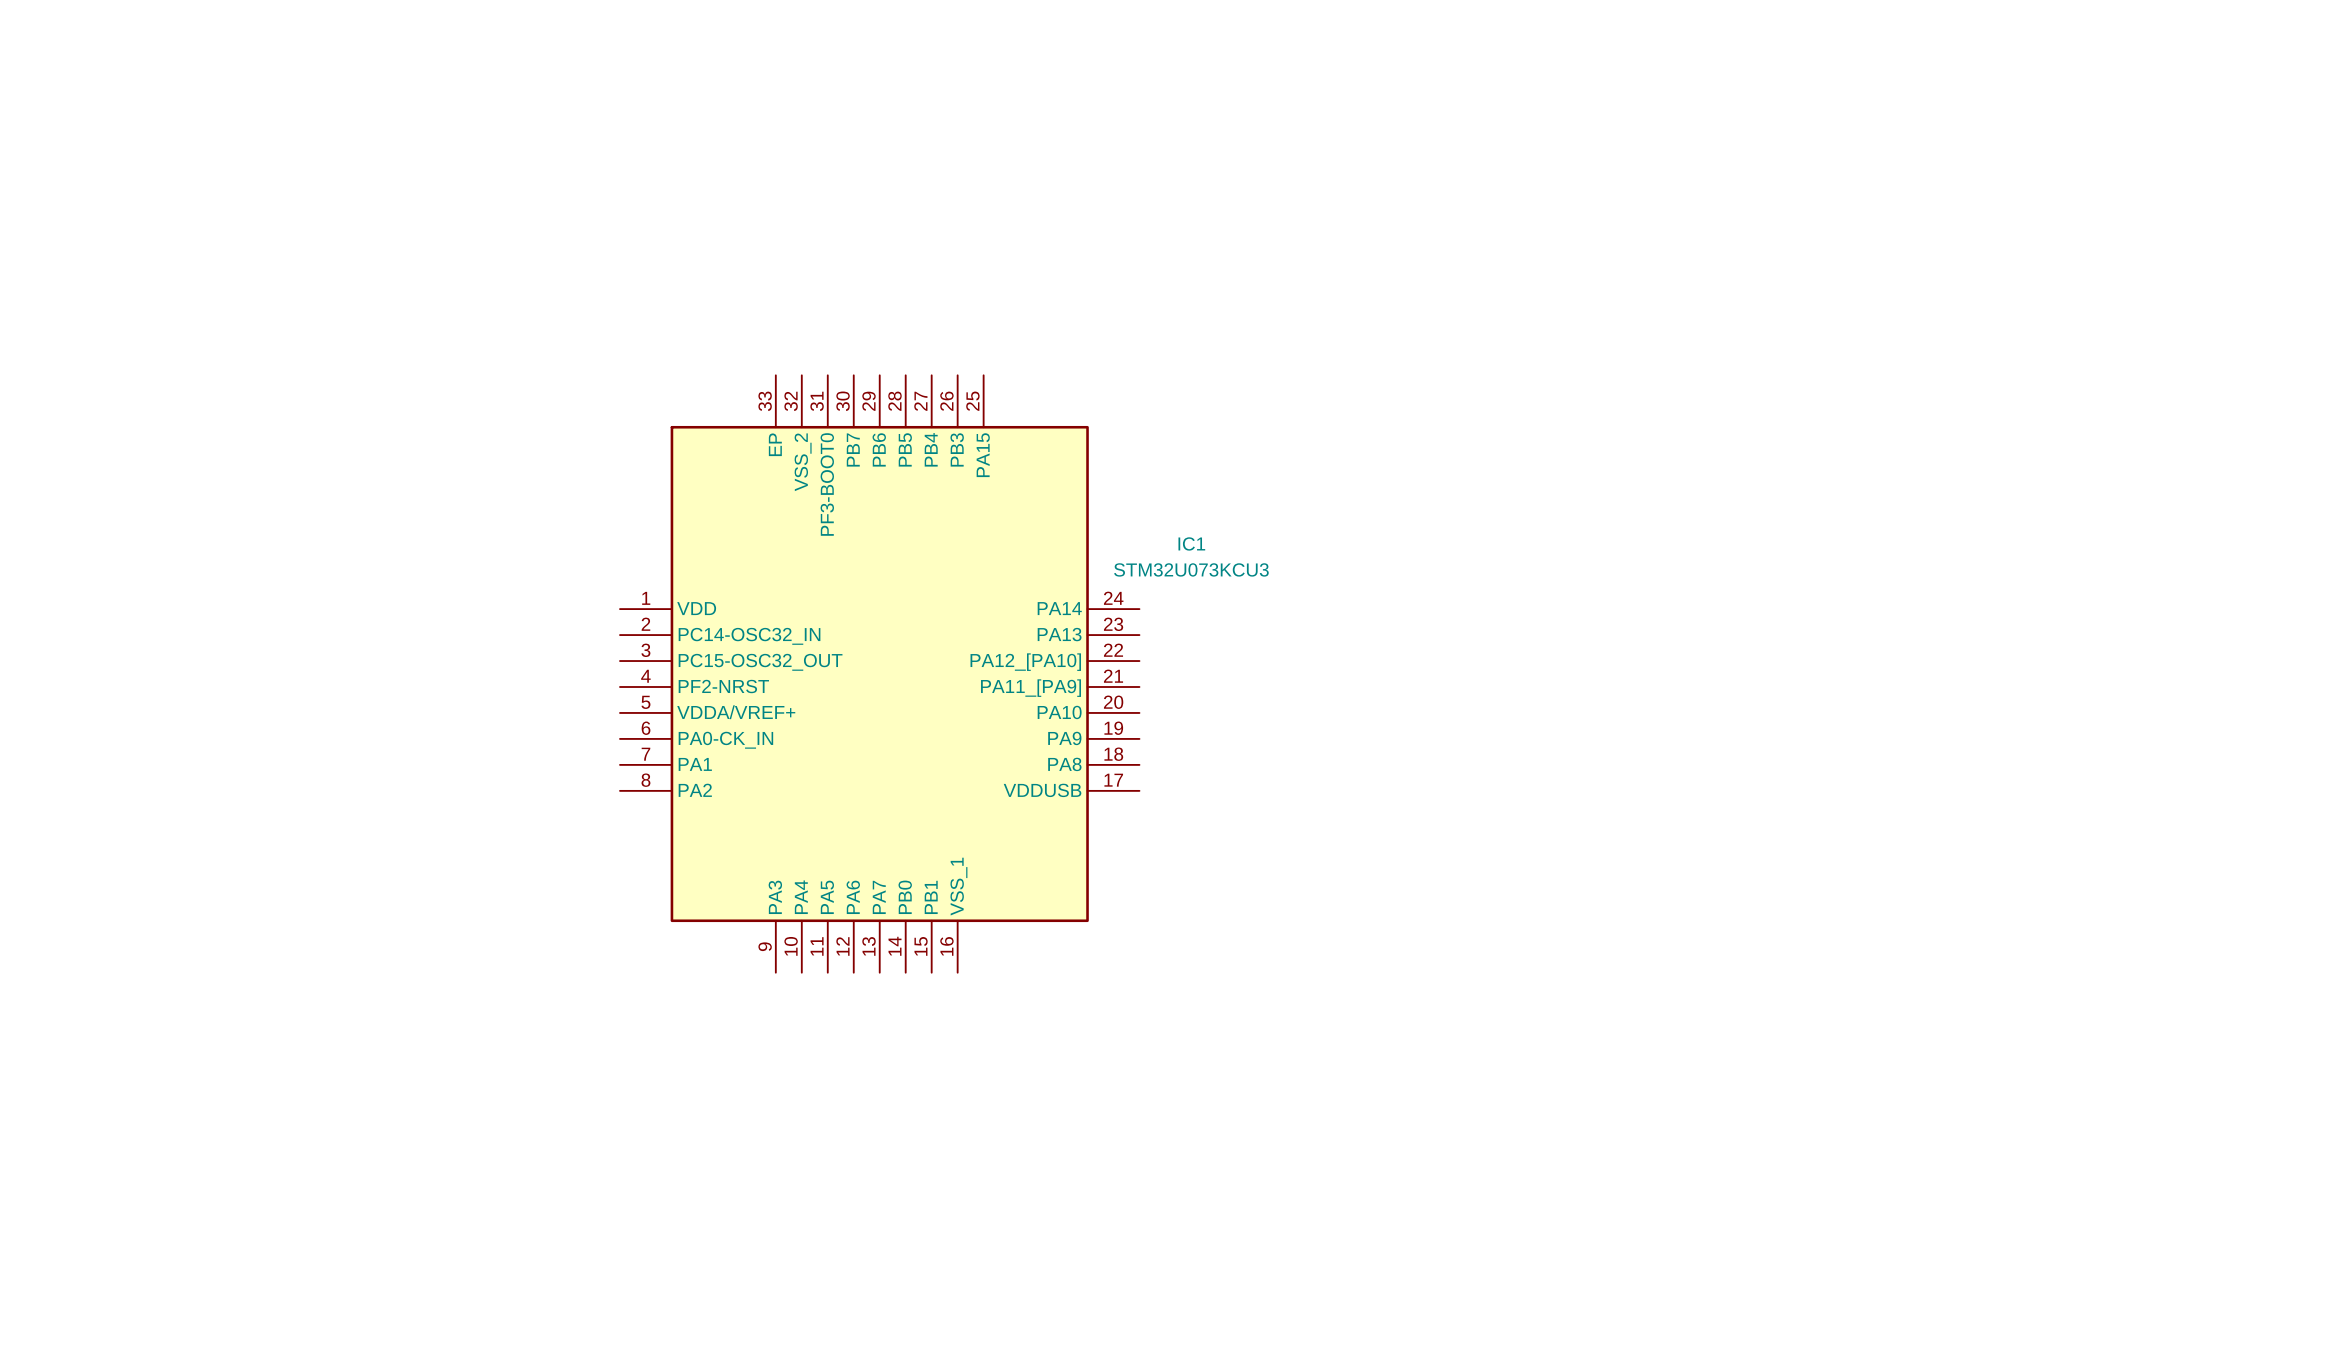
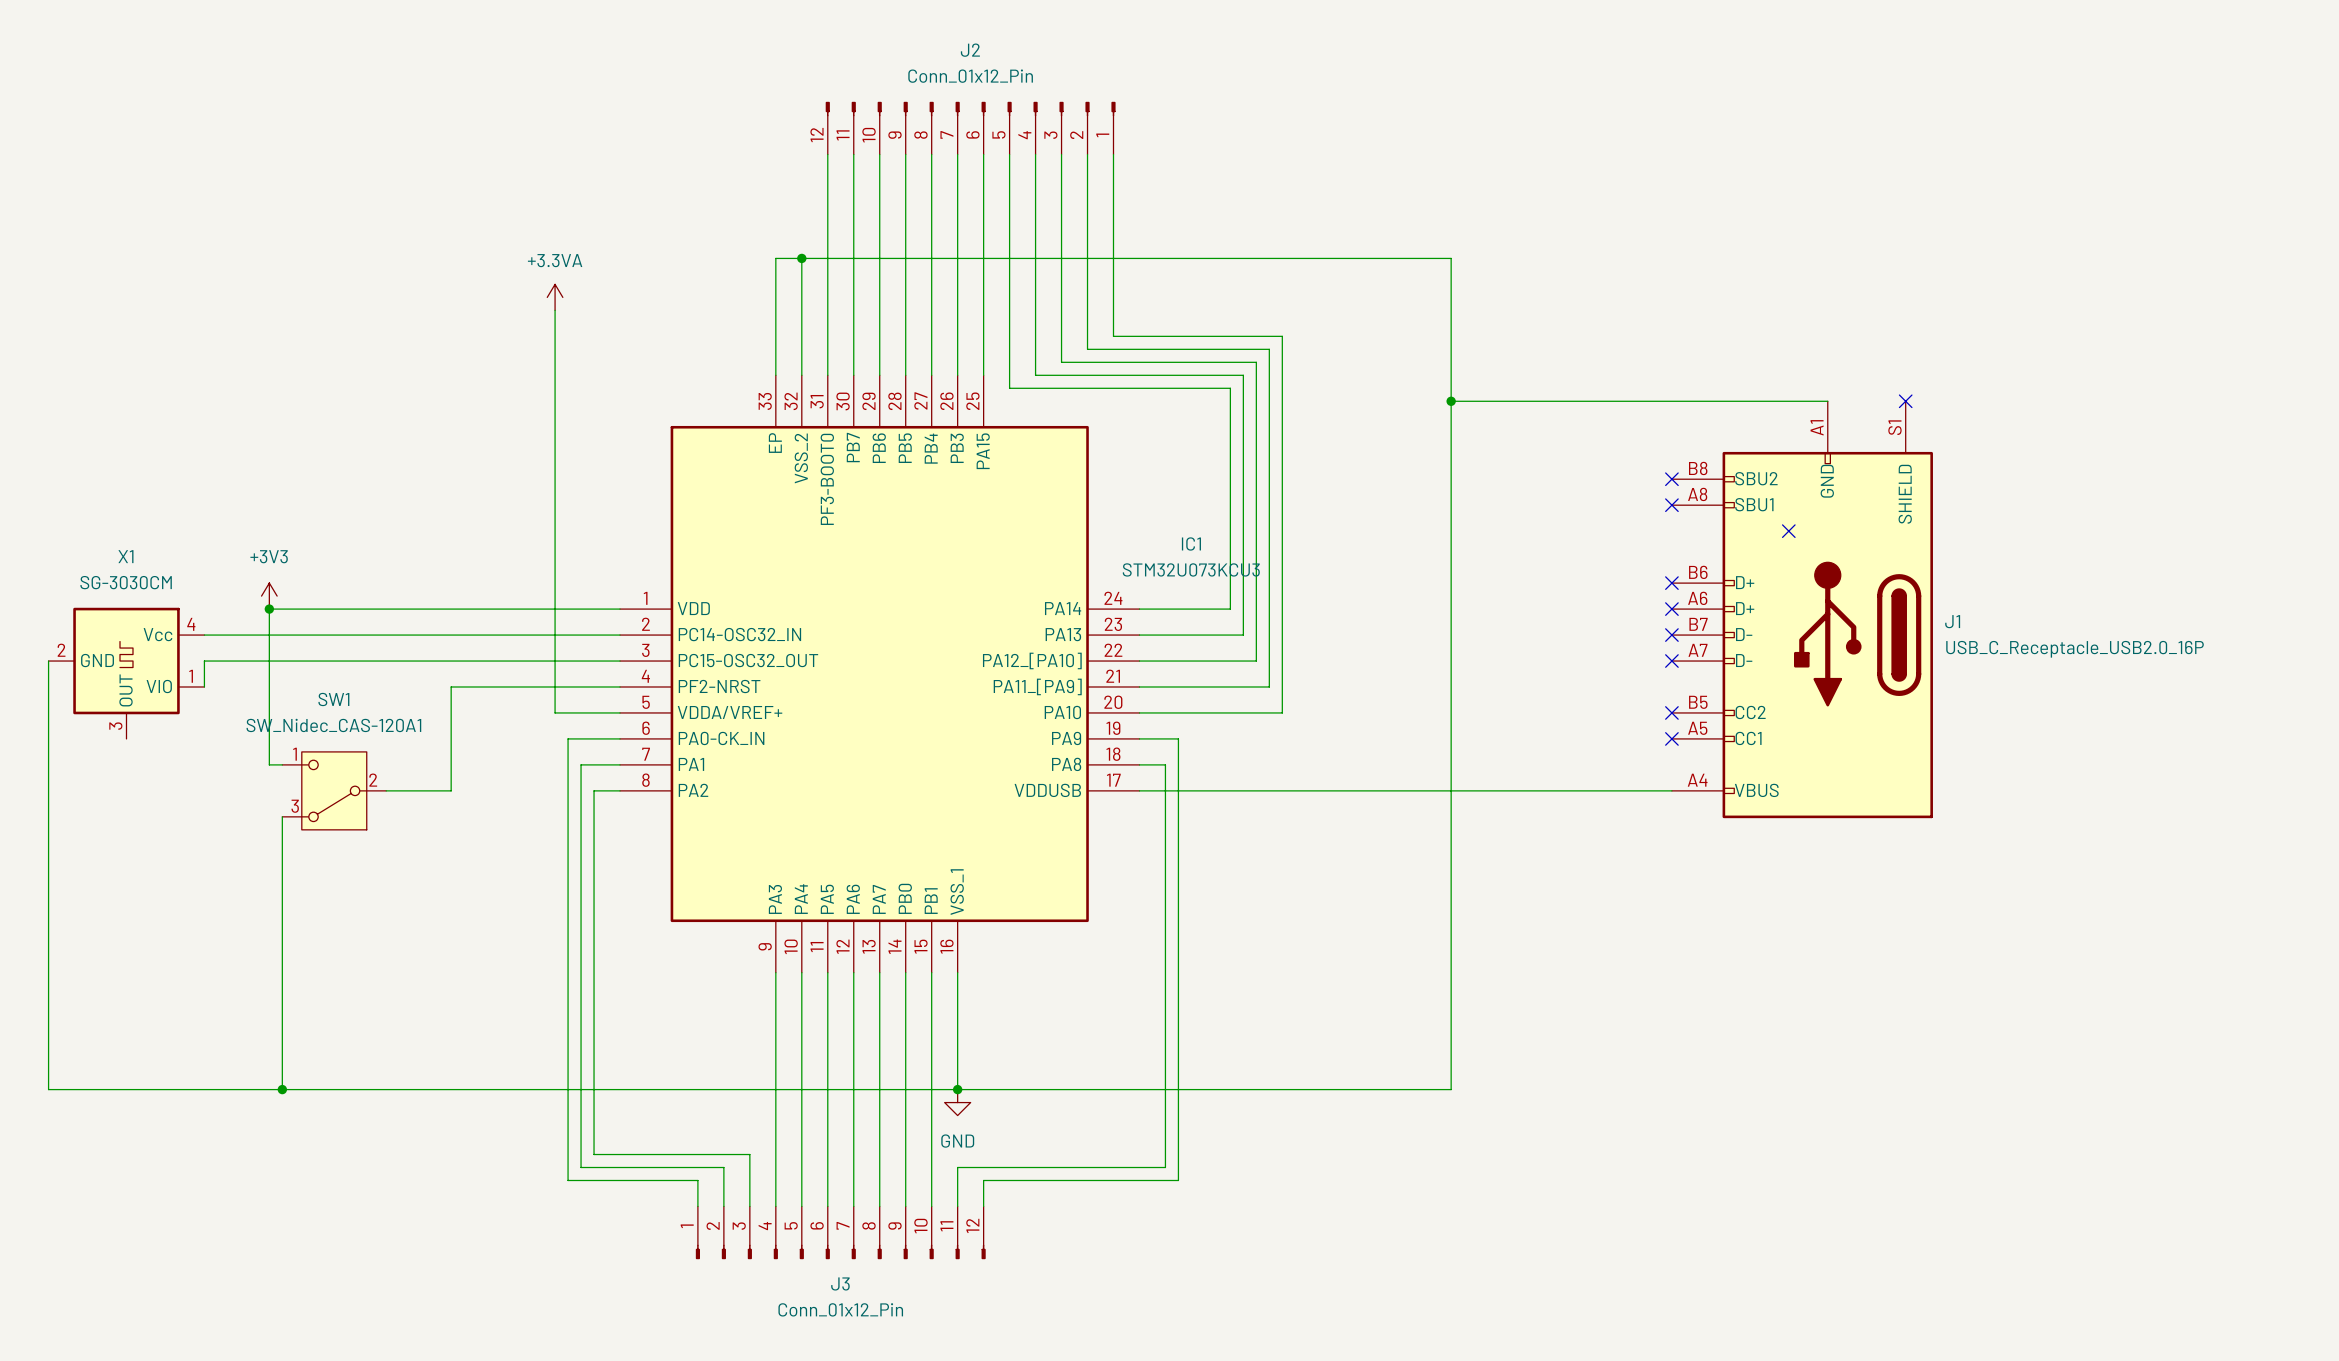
J2: none -> Conn_01x12_Pin (970, 128)
wire: none -> (827, 154) (827, 375)
wire: none -> (853, 154) (853, 375)
wire: none -> (879, 154) (879, 375)
wire: none -> (905, 154) (905, 375)
wire: none -> (931, 154) (931, 375)
wire: none -> (957, 154) (957, 375)
wire: none -> (983, 154) (983, 375)
wire: none -> (1009, 154) (1009, 388) (1230, 388) (1230, 609) (1139, 609)
wire: none -> (1035, 154) (1035, 375) (1243, 375) (1243, 635) (1139, 635)
wire: none -> (1061, 154) (1061, 362) (1256, 362) (1256, 661) (1139, 661)
wire: none -> (1087, 154) (1087, 349) (1269, 349) (1269, 686) (1139, 686)
wire: none -> (1113, 154) (1113, 336) (1282, 336) (1282, 712) (1139, 712)
wire: none -> (801, 258) (801, 375)
junction: none -> (801, 258)
power symbol: none -> +3.3VA (555, 297)
wire: none -> (555, 310) (555, 712) (619, 712)
wire: none -> (775, 375) (775, 258) (1451, 258) (1451, 1089) (48, 1089) (48, 661)
wire: none -> (1451, 401) (1827, 401)
junction: none -> (1451, 401)
no-connect mark: none -> (1905, 401)
no-connect mark: none -> (1671, 479)
no-connect mark: none -> (1671, 505)
no-connect mark: none -> (1788, 531)
no-connect mark: none -> (1671, 583)
power symbol: none -> +3V3 (269, 596)
junction: none -> (269, 609)
wire: none -> (619, 609) (269, 609) (269, 764) (282, 764)
no-connect mark: none -> (1671, 609)
J1: none -> USB_C_Receptacle_USB2.0_16P (1802, 609)
wire: none -> (204, 635) (619, 635)
no-connect mark: none -> (1671, 635)
wire: none -> (619, 661) (204, 661) (204, 686)
no-connect mark: none -> (1671, 661)
X1: none -> SG-3030CM (126, 673)
wire: none -> (619, 686) (451, 686) (451, 790) (386, 790)
no-connect mark: none -> (1671, 712)
wire: none -> (619, 738) (568, 738) (568, 1180) (697, 1180) (697, 1206)
wire: none -> (1139, 738) (1178, 738) (1178, 1180) (983, 1180) (983, 1206)
no-connect mark: none -> (1671, 738)
wire: none -> (619, 764) (581, 764) (581, 1167) (723, 1167) (723, 1206)
wire: none -> (1139, 764) (1165, 764) (1165, 1167) (957, 1167) (957, 1206)
SW1: none -> SW_Nidec_CAS-120A1 (334, 790)
wire: none -> (619, 790) (594, 790) (594, 1154) (749, 1154) (749, 1206)
wire: none -> (1139, 790) (1671, 790)
wire: none -> (282, 816) (282, 1089)
wire: none -> (775, 972) (775, 1206)
wire: none -> (801, 972) (801, 1206)
wire: none -> (827, 972) (827, 1206)
wire: none -> (853, 972) (853, 1206)
wire: none -> (879, 972) (879, 1206)
wire: none -> (905, 972) (905, 1206)
wire: none -> (931, 972) (931, 1206)
wire: none -> (957, 972) (957, 1089)
junction: none -> (282, 1089)
junction: none -> (957, 1089)
power symbol: none -> GND (957, 1102)
J3: none -> Conn_01x12_Pin (840, 1232)

